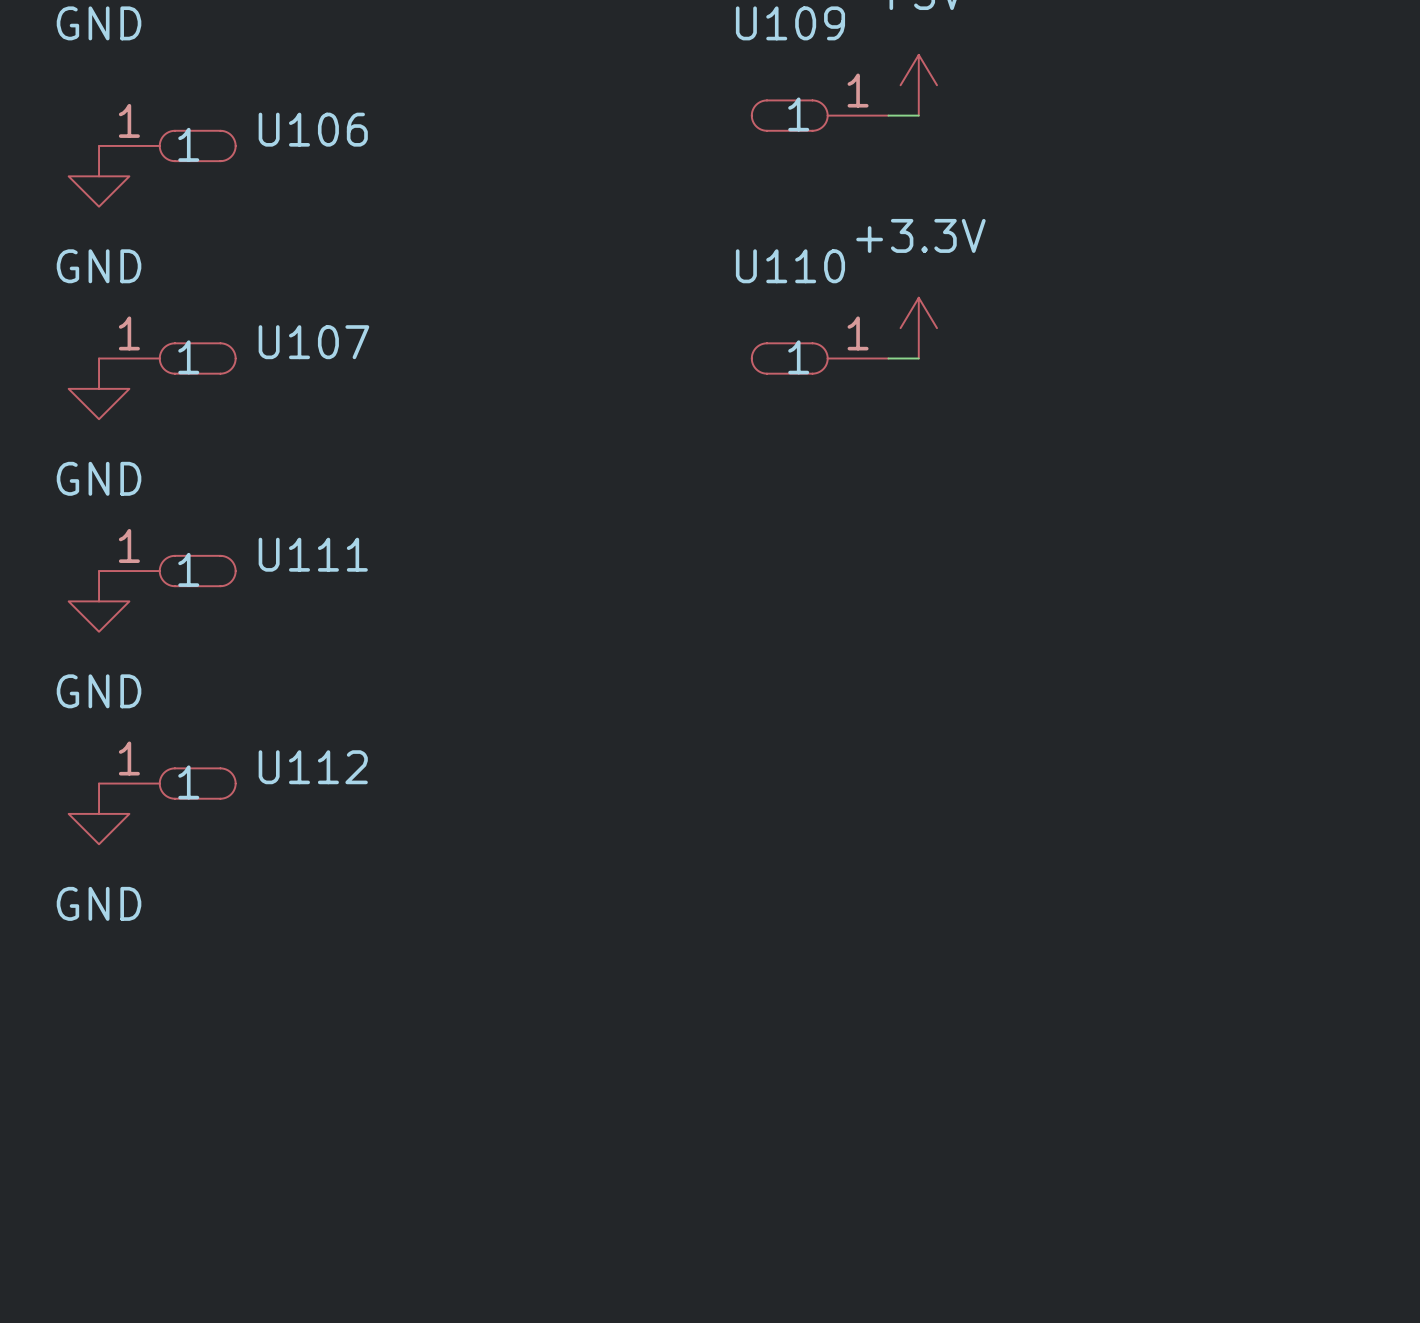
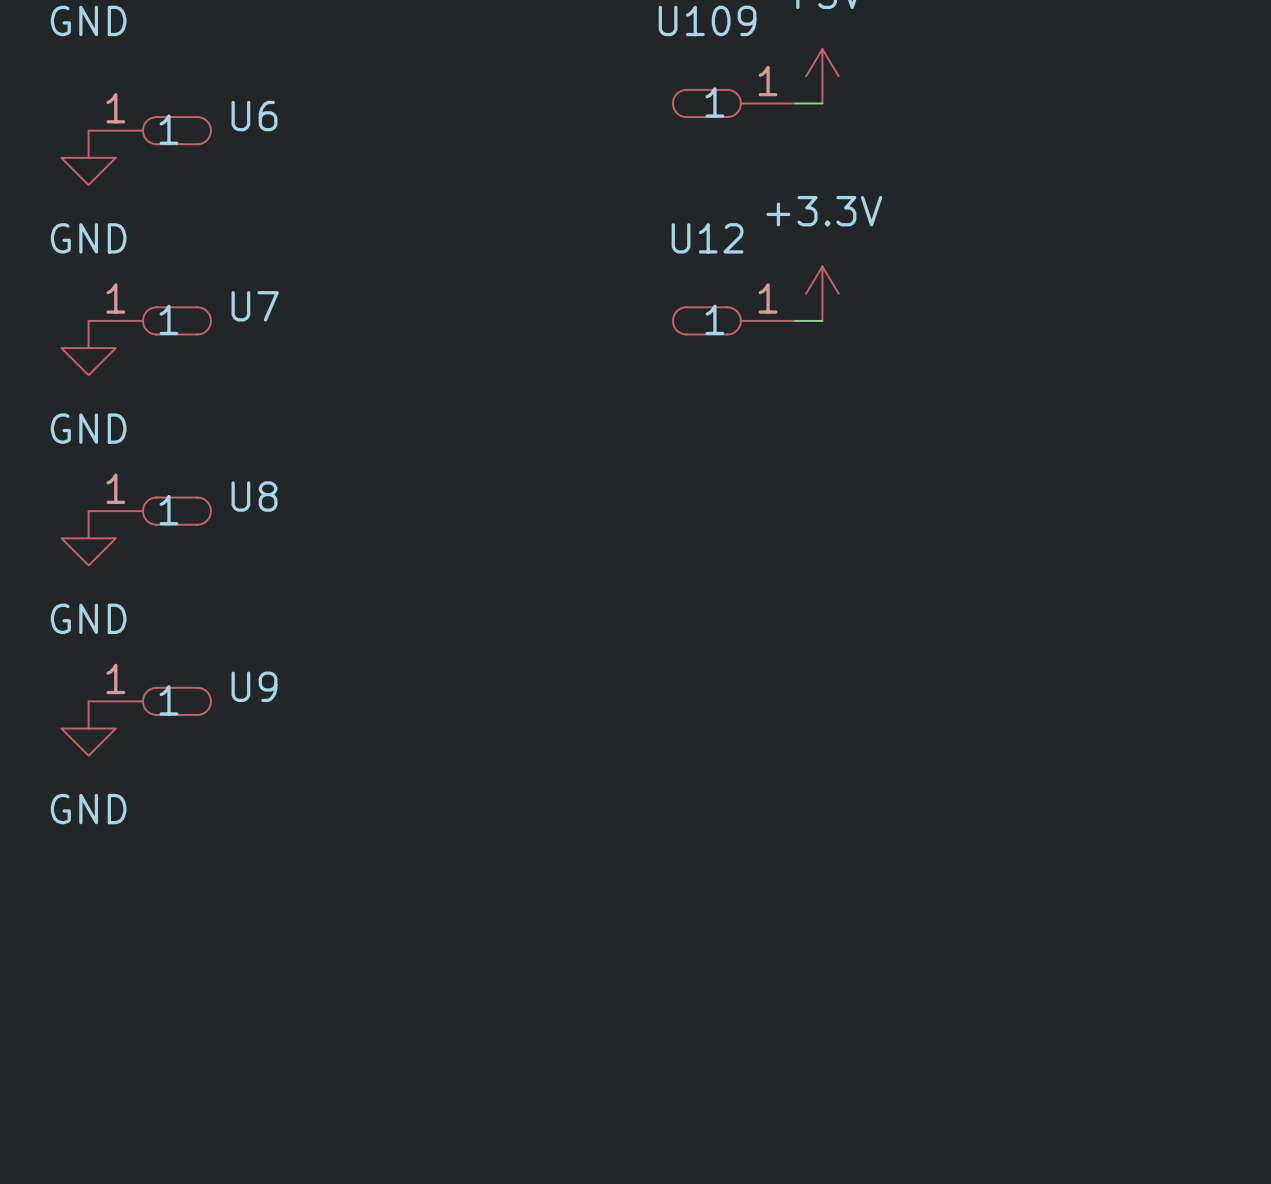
U106 name: U106 (313, 129) -> U6 (254, 116)
U110 name: U110 (790, 266) -> U12 (707, 238)
U107 name: U107 (313, 342) -> U7 (255, 306)
U111 name: U111 (313, 554) -> U8 (254, 496)
U112 name: U112 (313, 767) -> U9 (254, 686)

